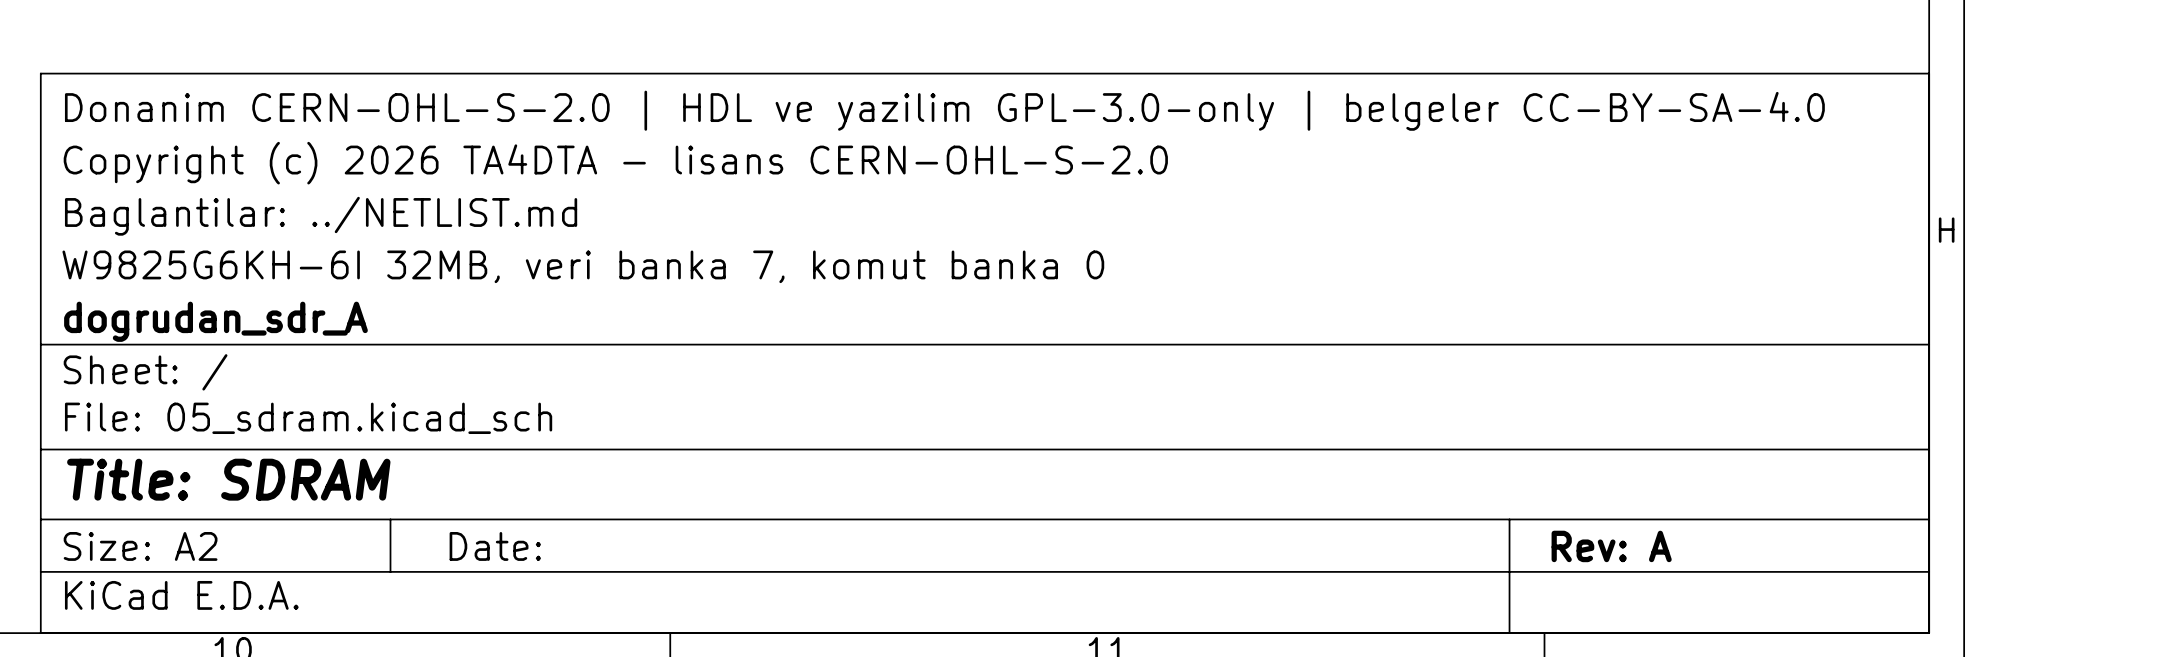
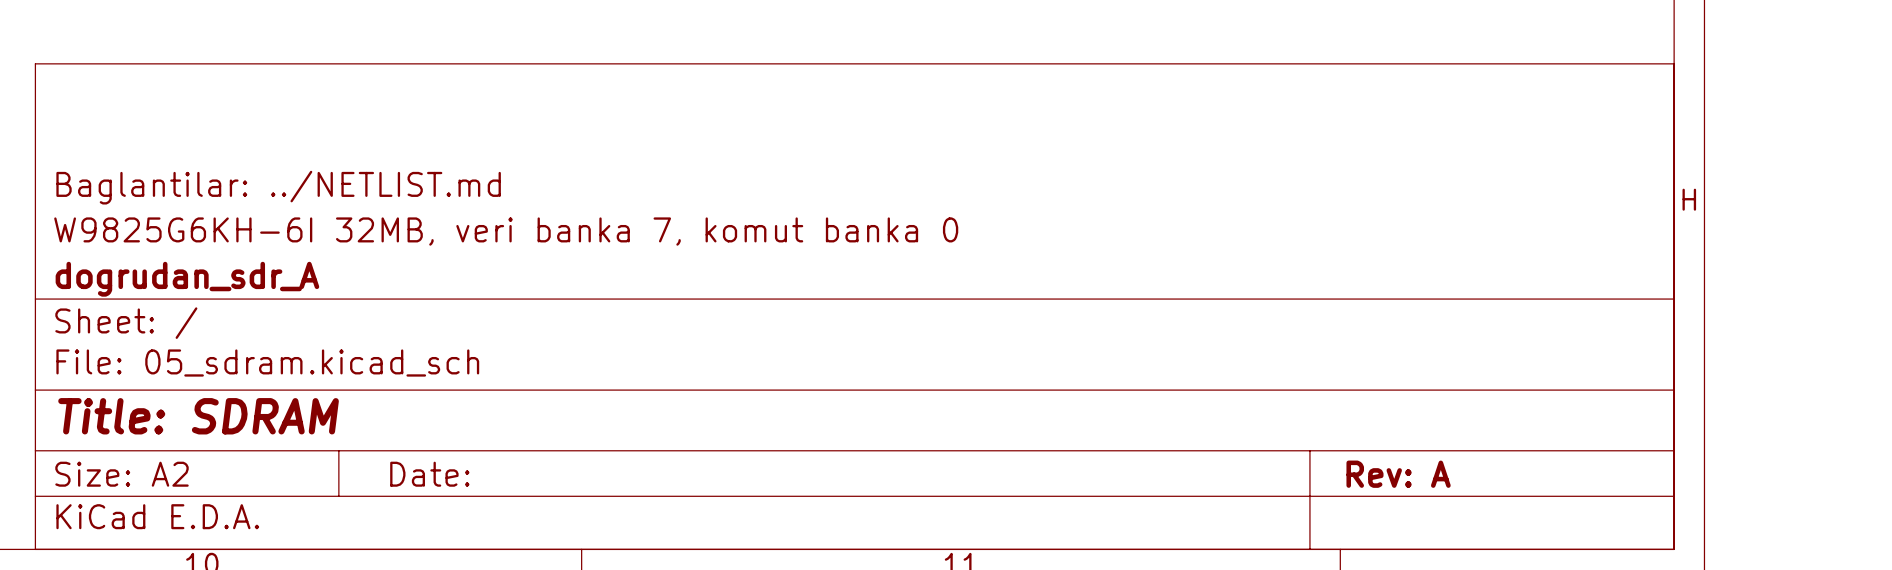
title block: Donanim CERN-OHL-S-2.0 | HDL ve yazilim GPL-3.0-only | belgeler CC-BY-SA-4.0 (944, 110) -> none
title block: Copyright (c) 2026 TA4DTA - lisans CERN-OHL-S-2.0 (615, 163) -> none

